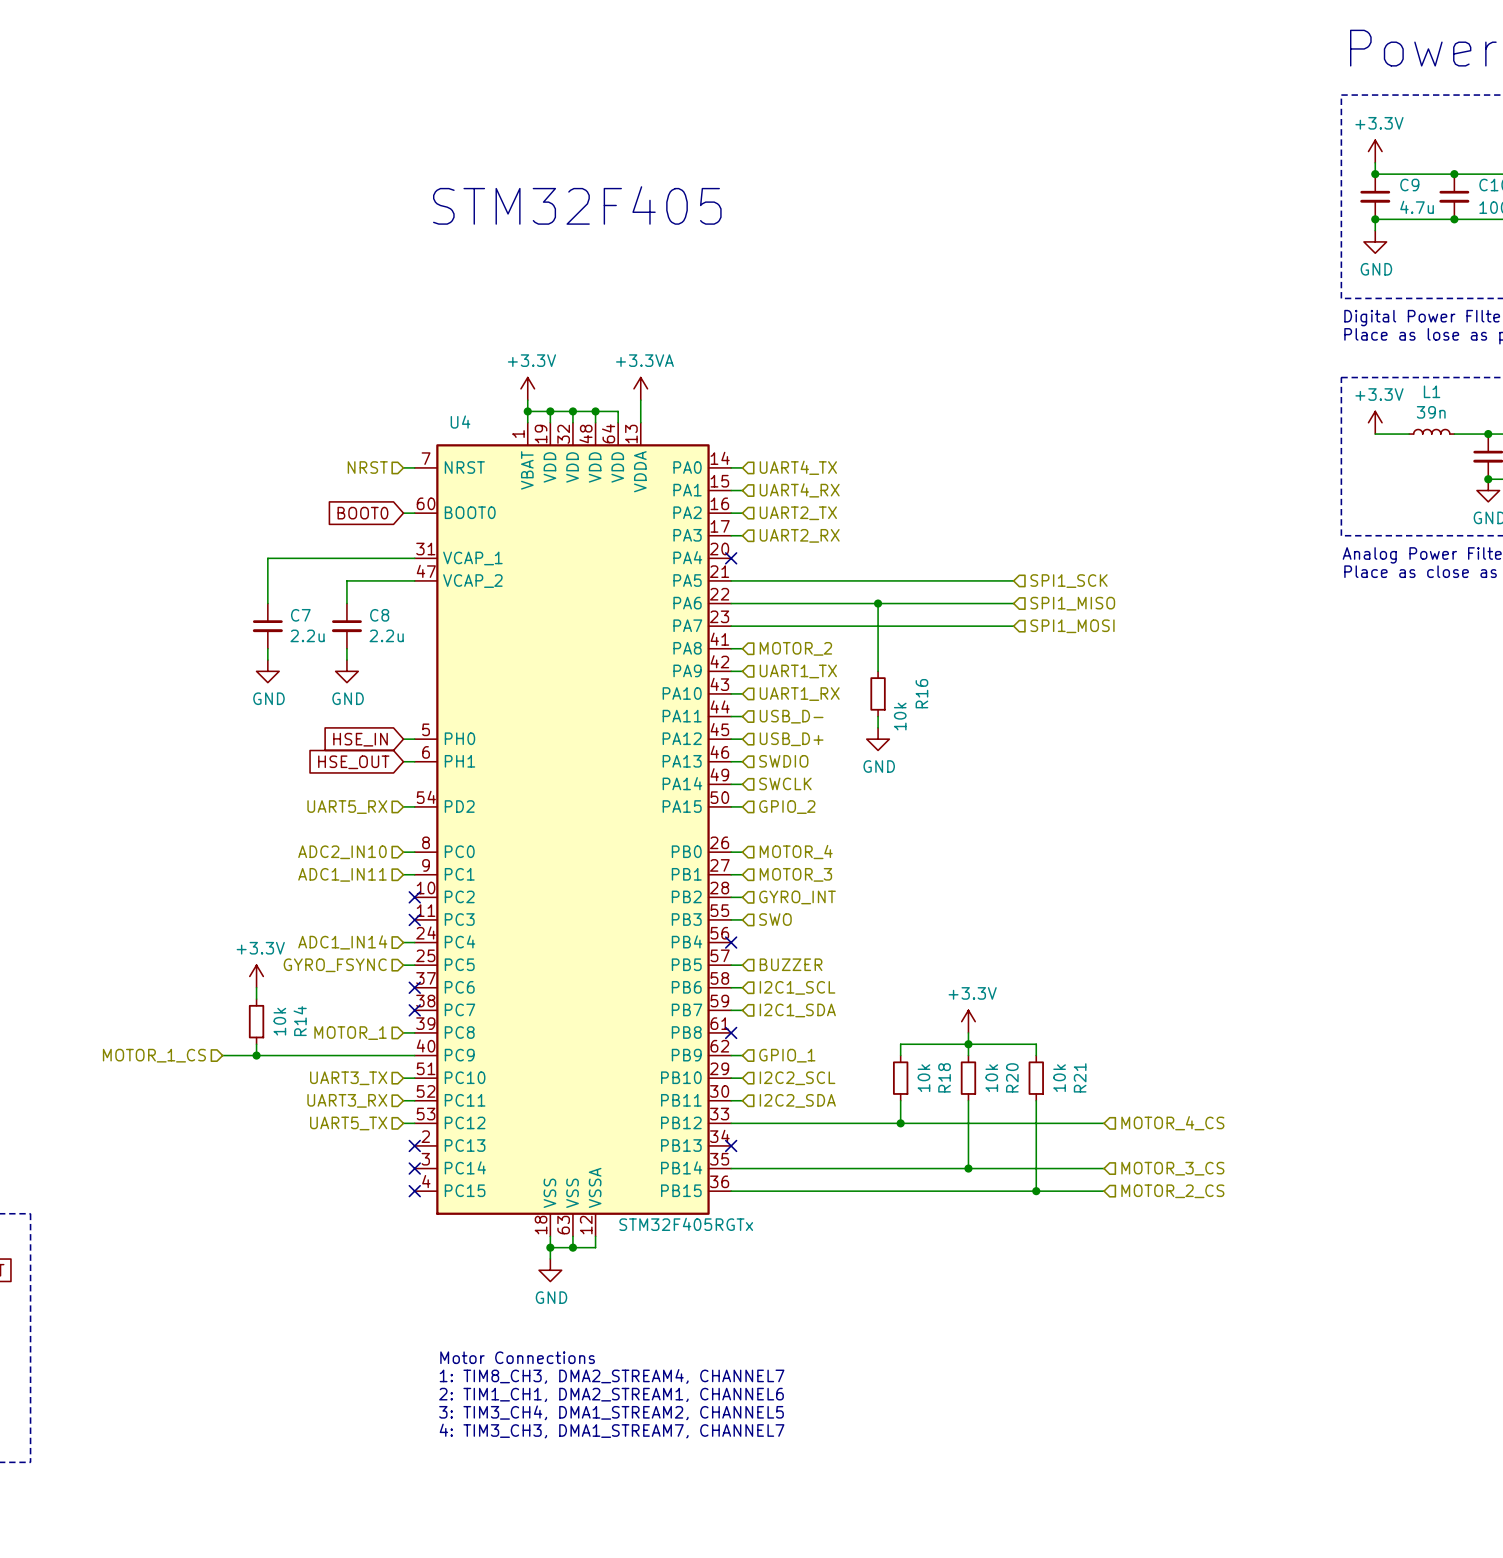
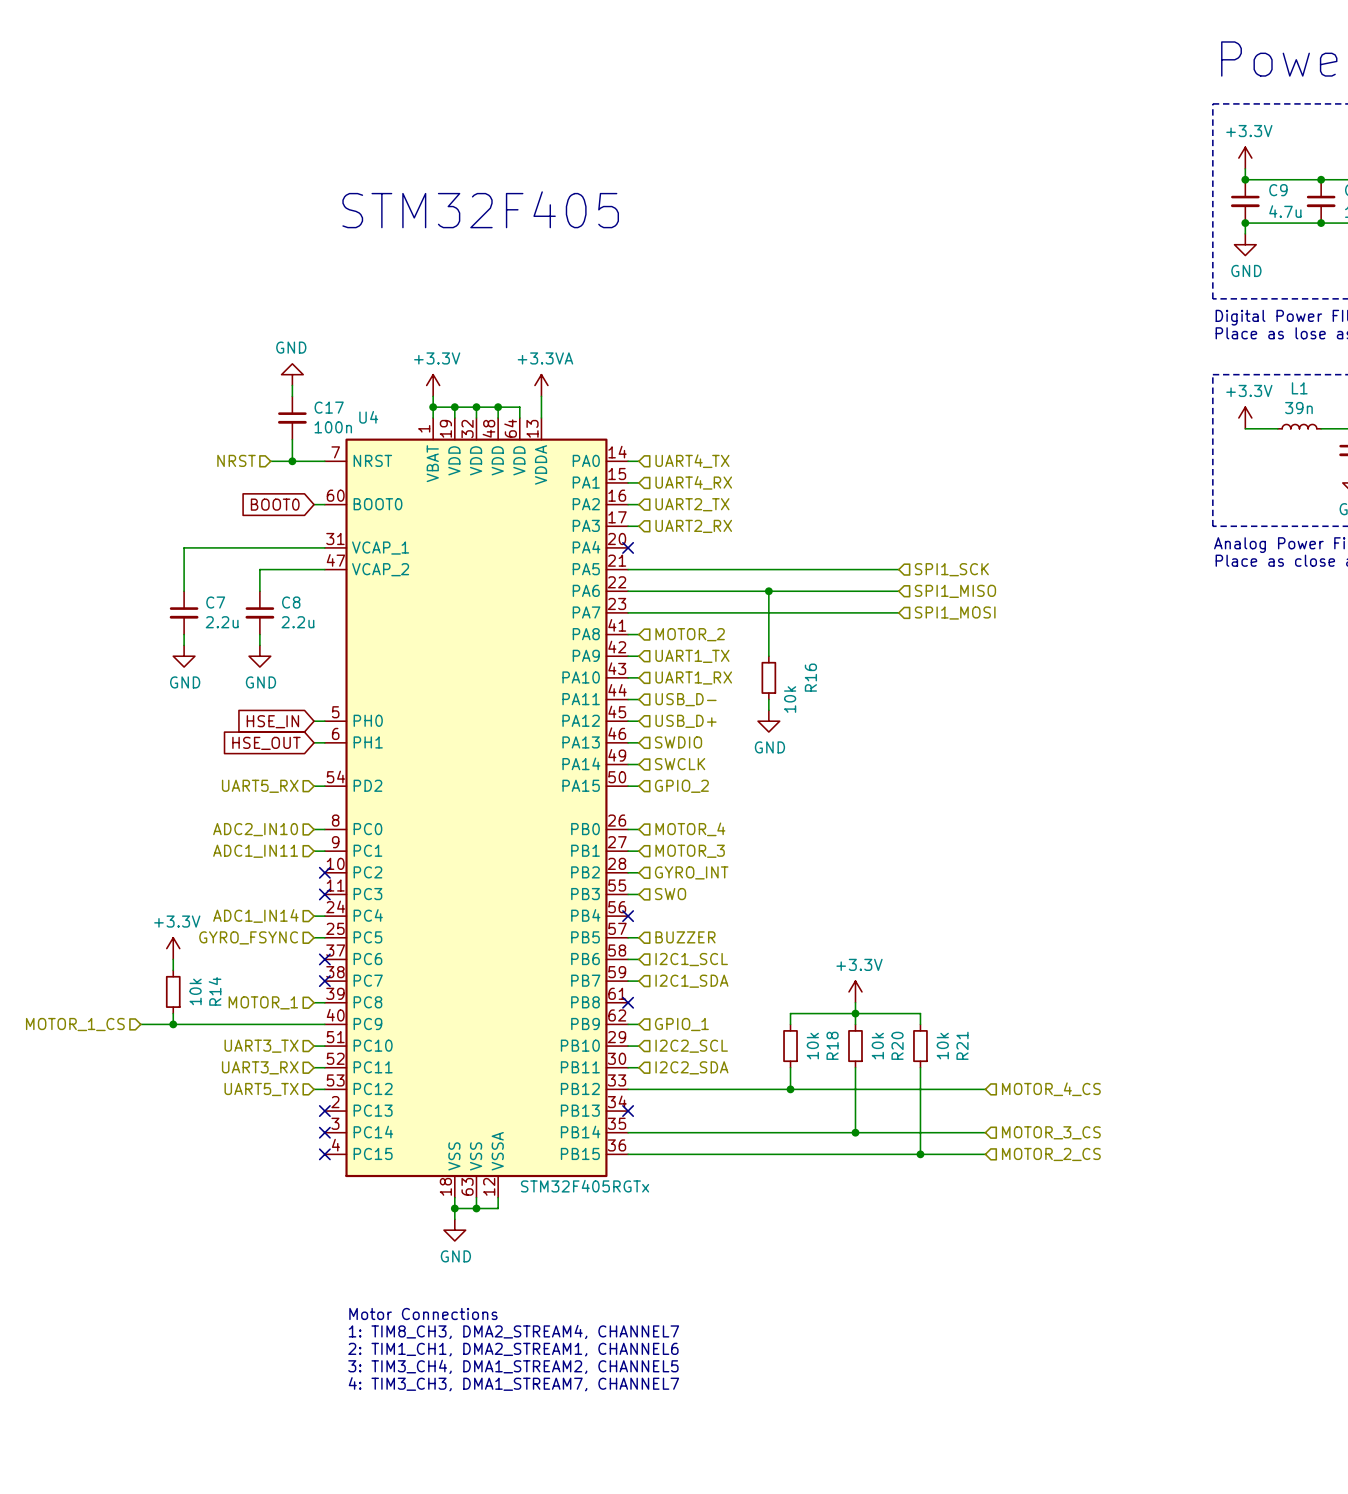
power symbol: none -> GND (292, 374)
wire: none -> (292, 385) (292, 396)
C17: none -> 100n (292, 417)
wire: none -> (292, 439) (292, 461)
wire: none -> (270, 461) (314, 461)
hierarchical label position: NRST (367, 467) -> NRST (236, 460)
junction: none -> (292, 461)

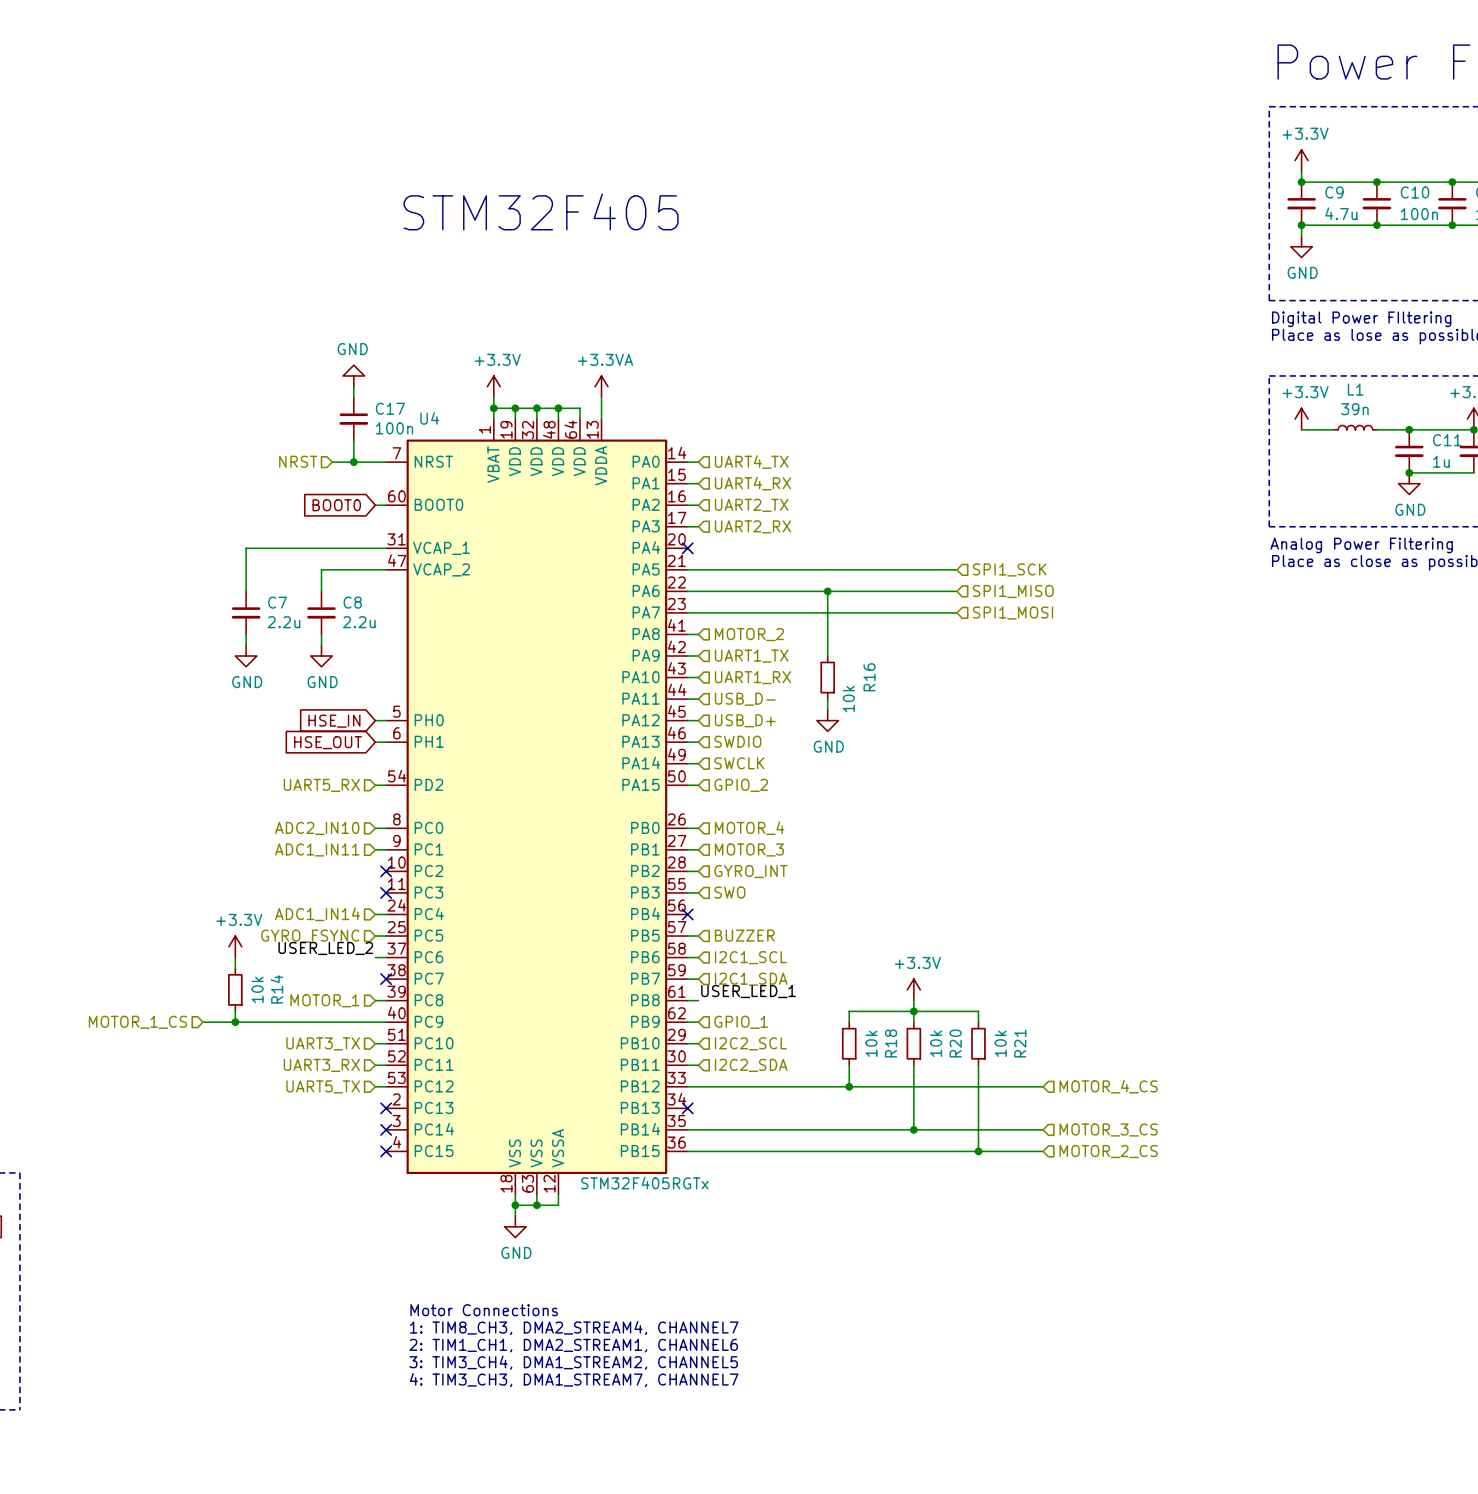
label: none -> USER_LED_2 (325, 948)
wire: none -> (375, 957) (386, 957)
no-connect mark: (324, 959) -> none
label: none -> USER_LED_1 (748, 991)
wire: none -> (687, 1000) (698, 1000)
no-connect mark: (628, 1002) -> none

